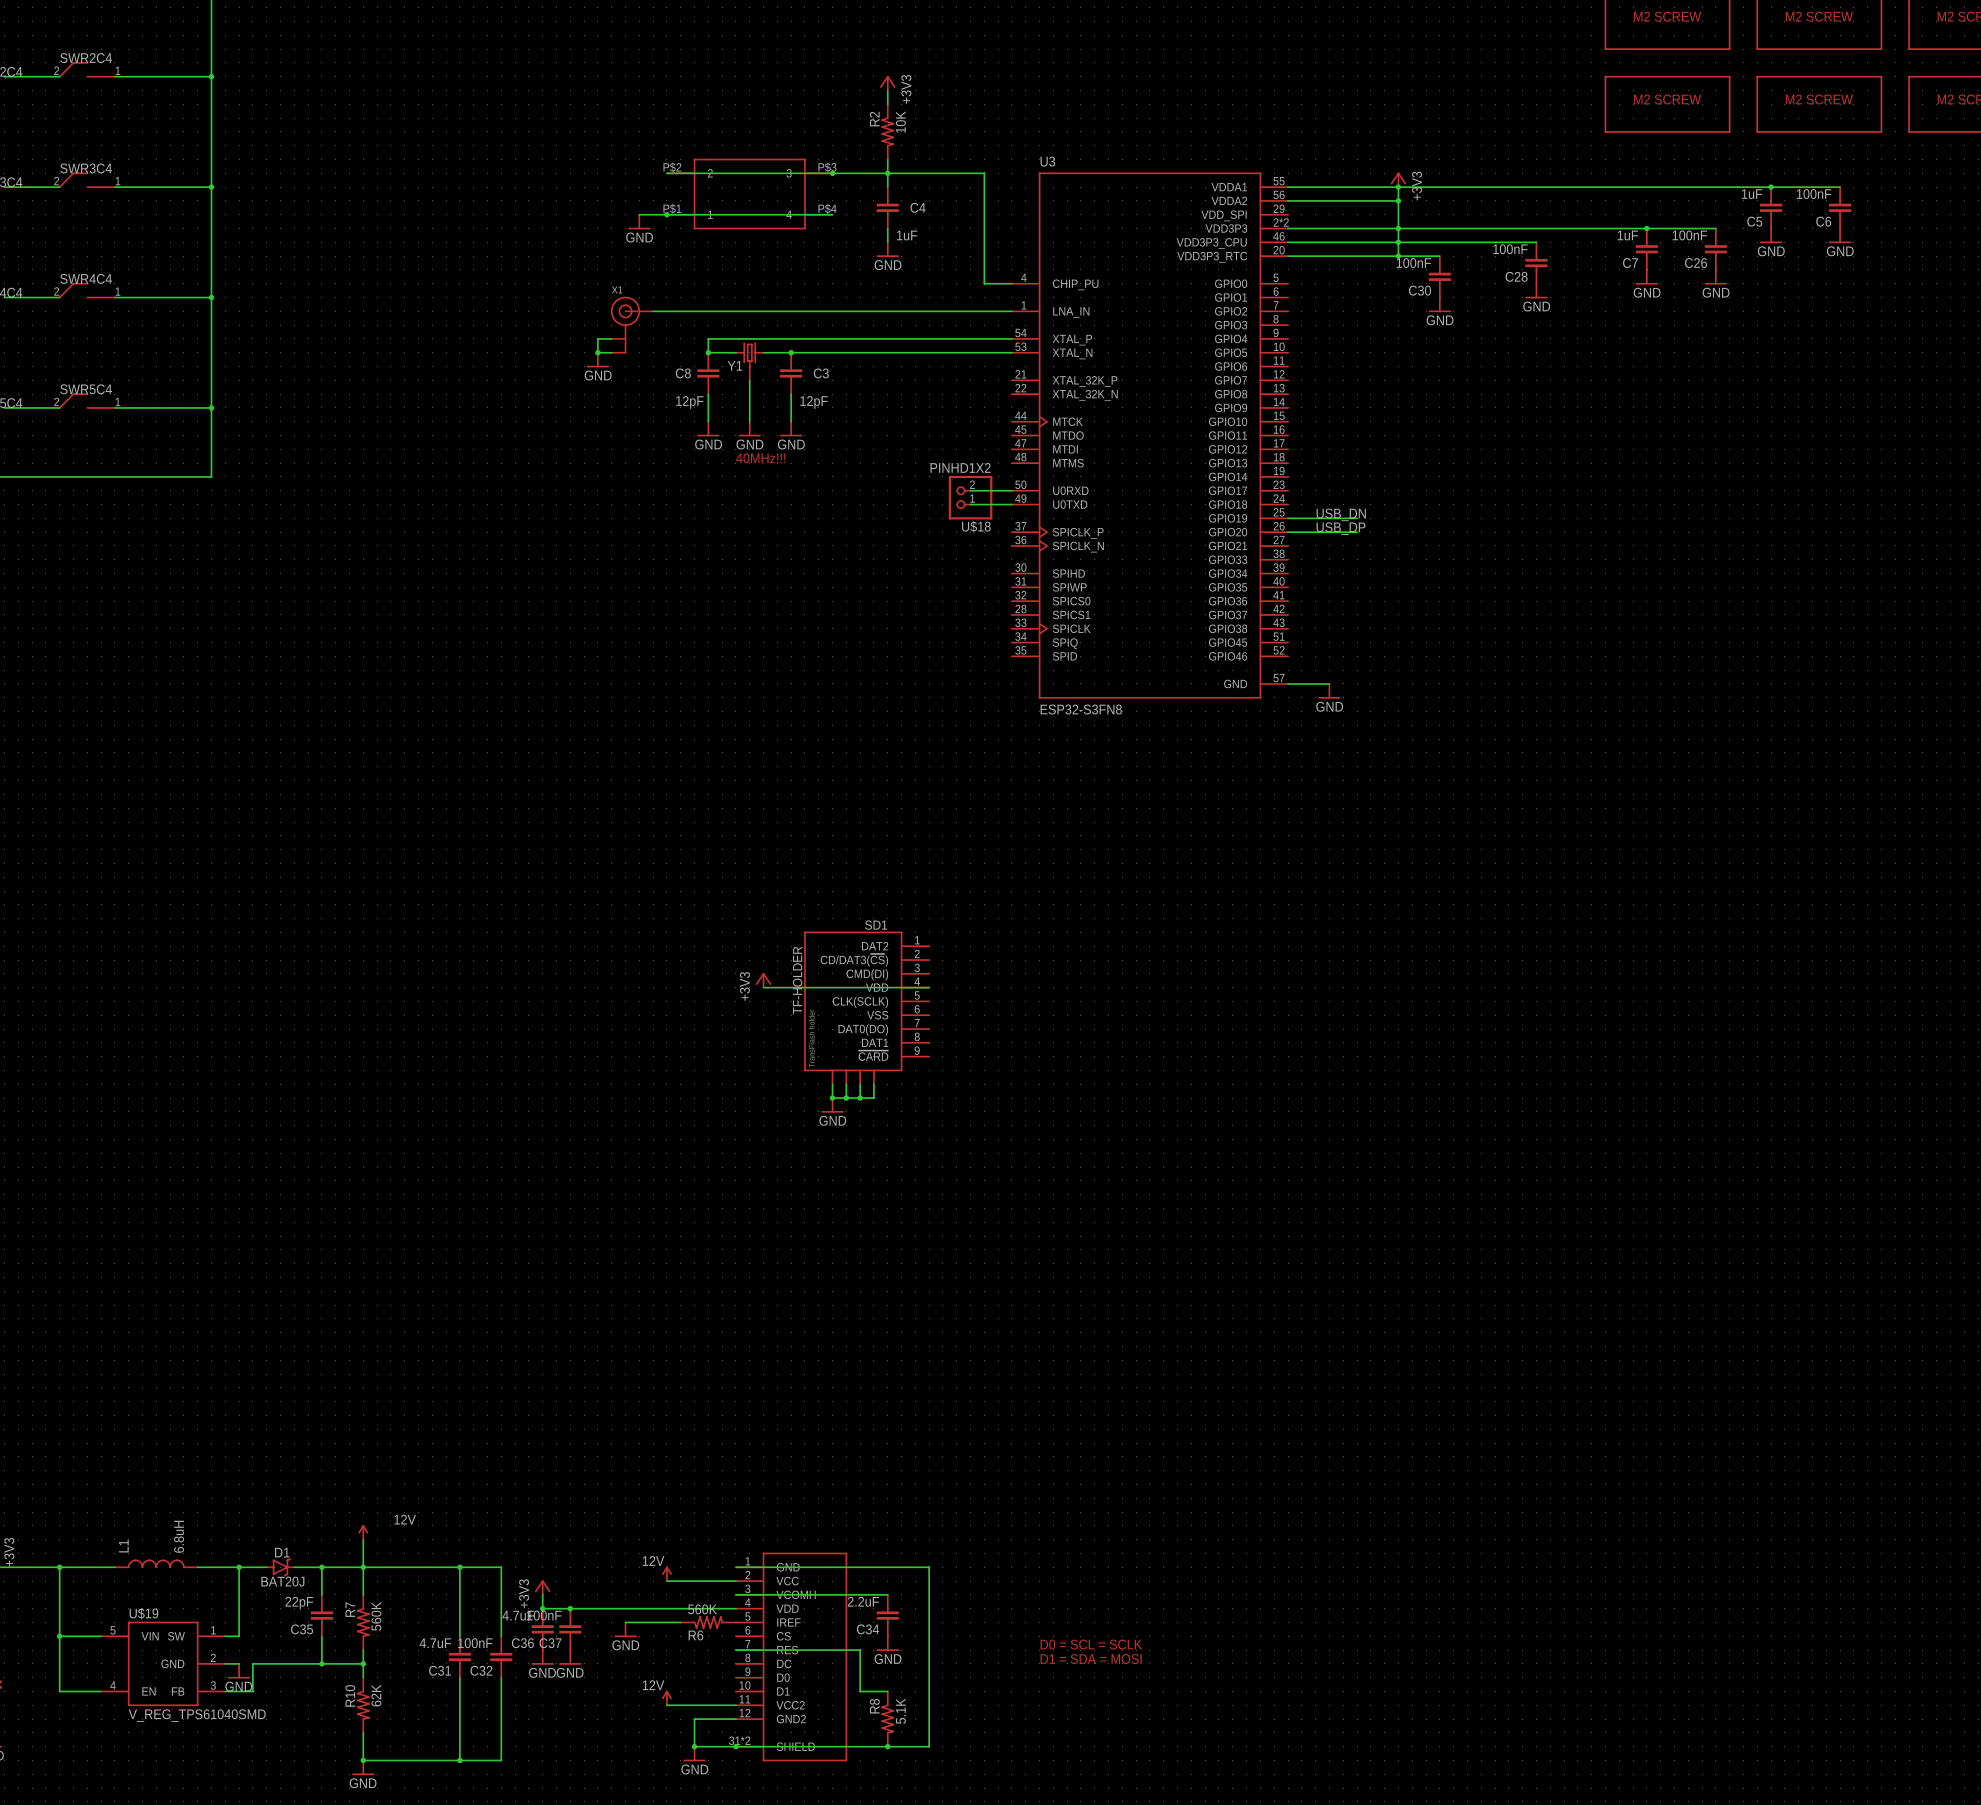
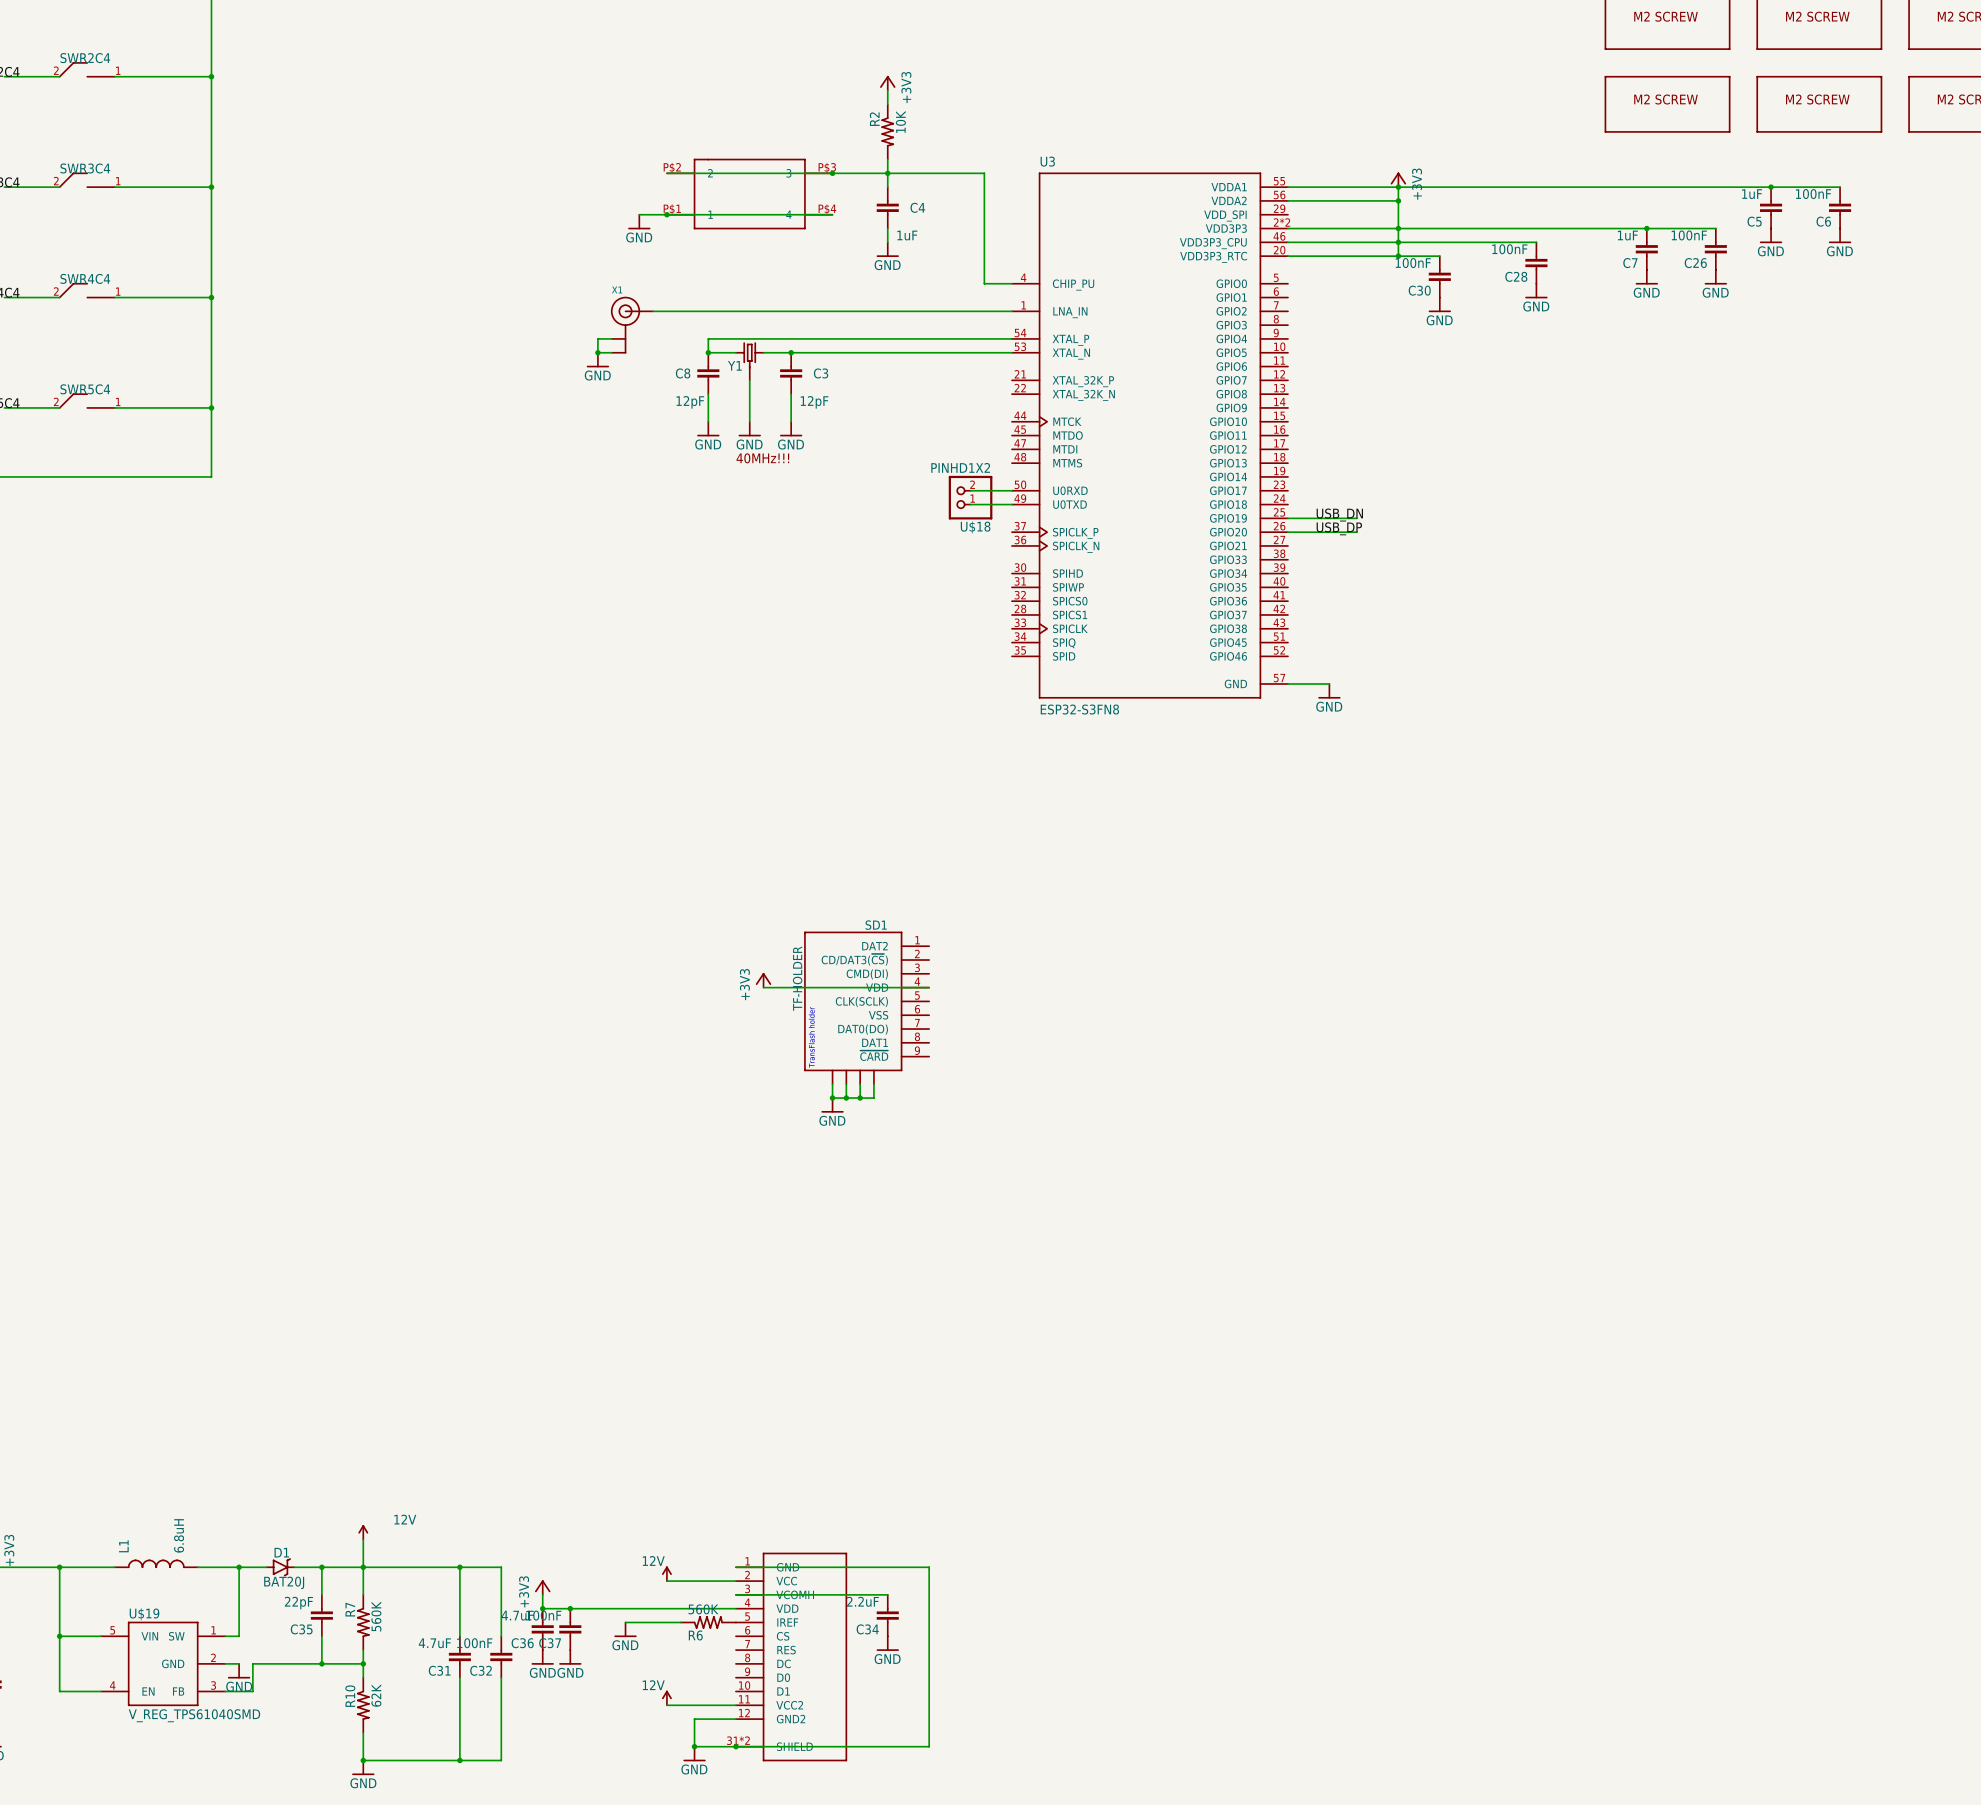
text: D0 = SCL = SCLK (1091, 1644) -> none
wire: (735, 1650) (860, 1650) (860, 1691) (887, 1691) -> none
text: D1 = SDA = MOSI (1091, 1659) -> none
R8: 5.1K (887, 1719) -> none
junction: (887, 1746) -> none

